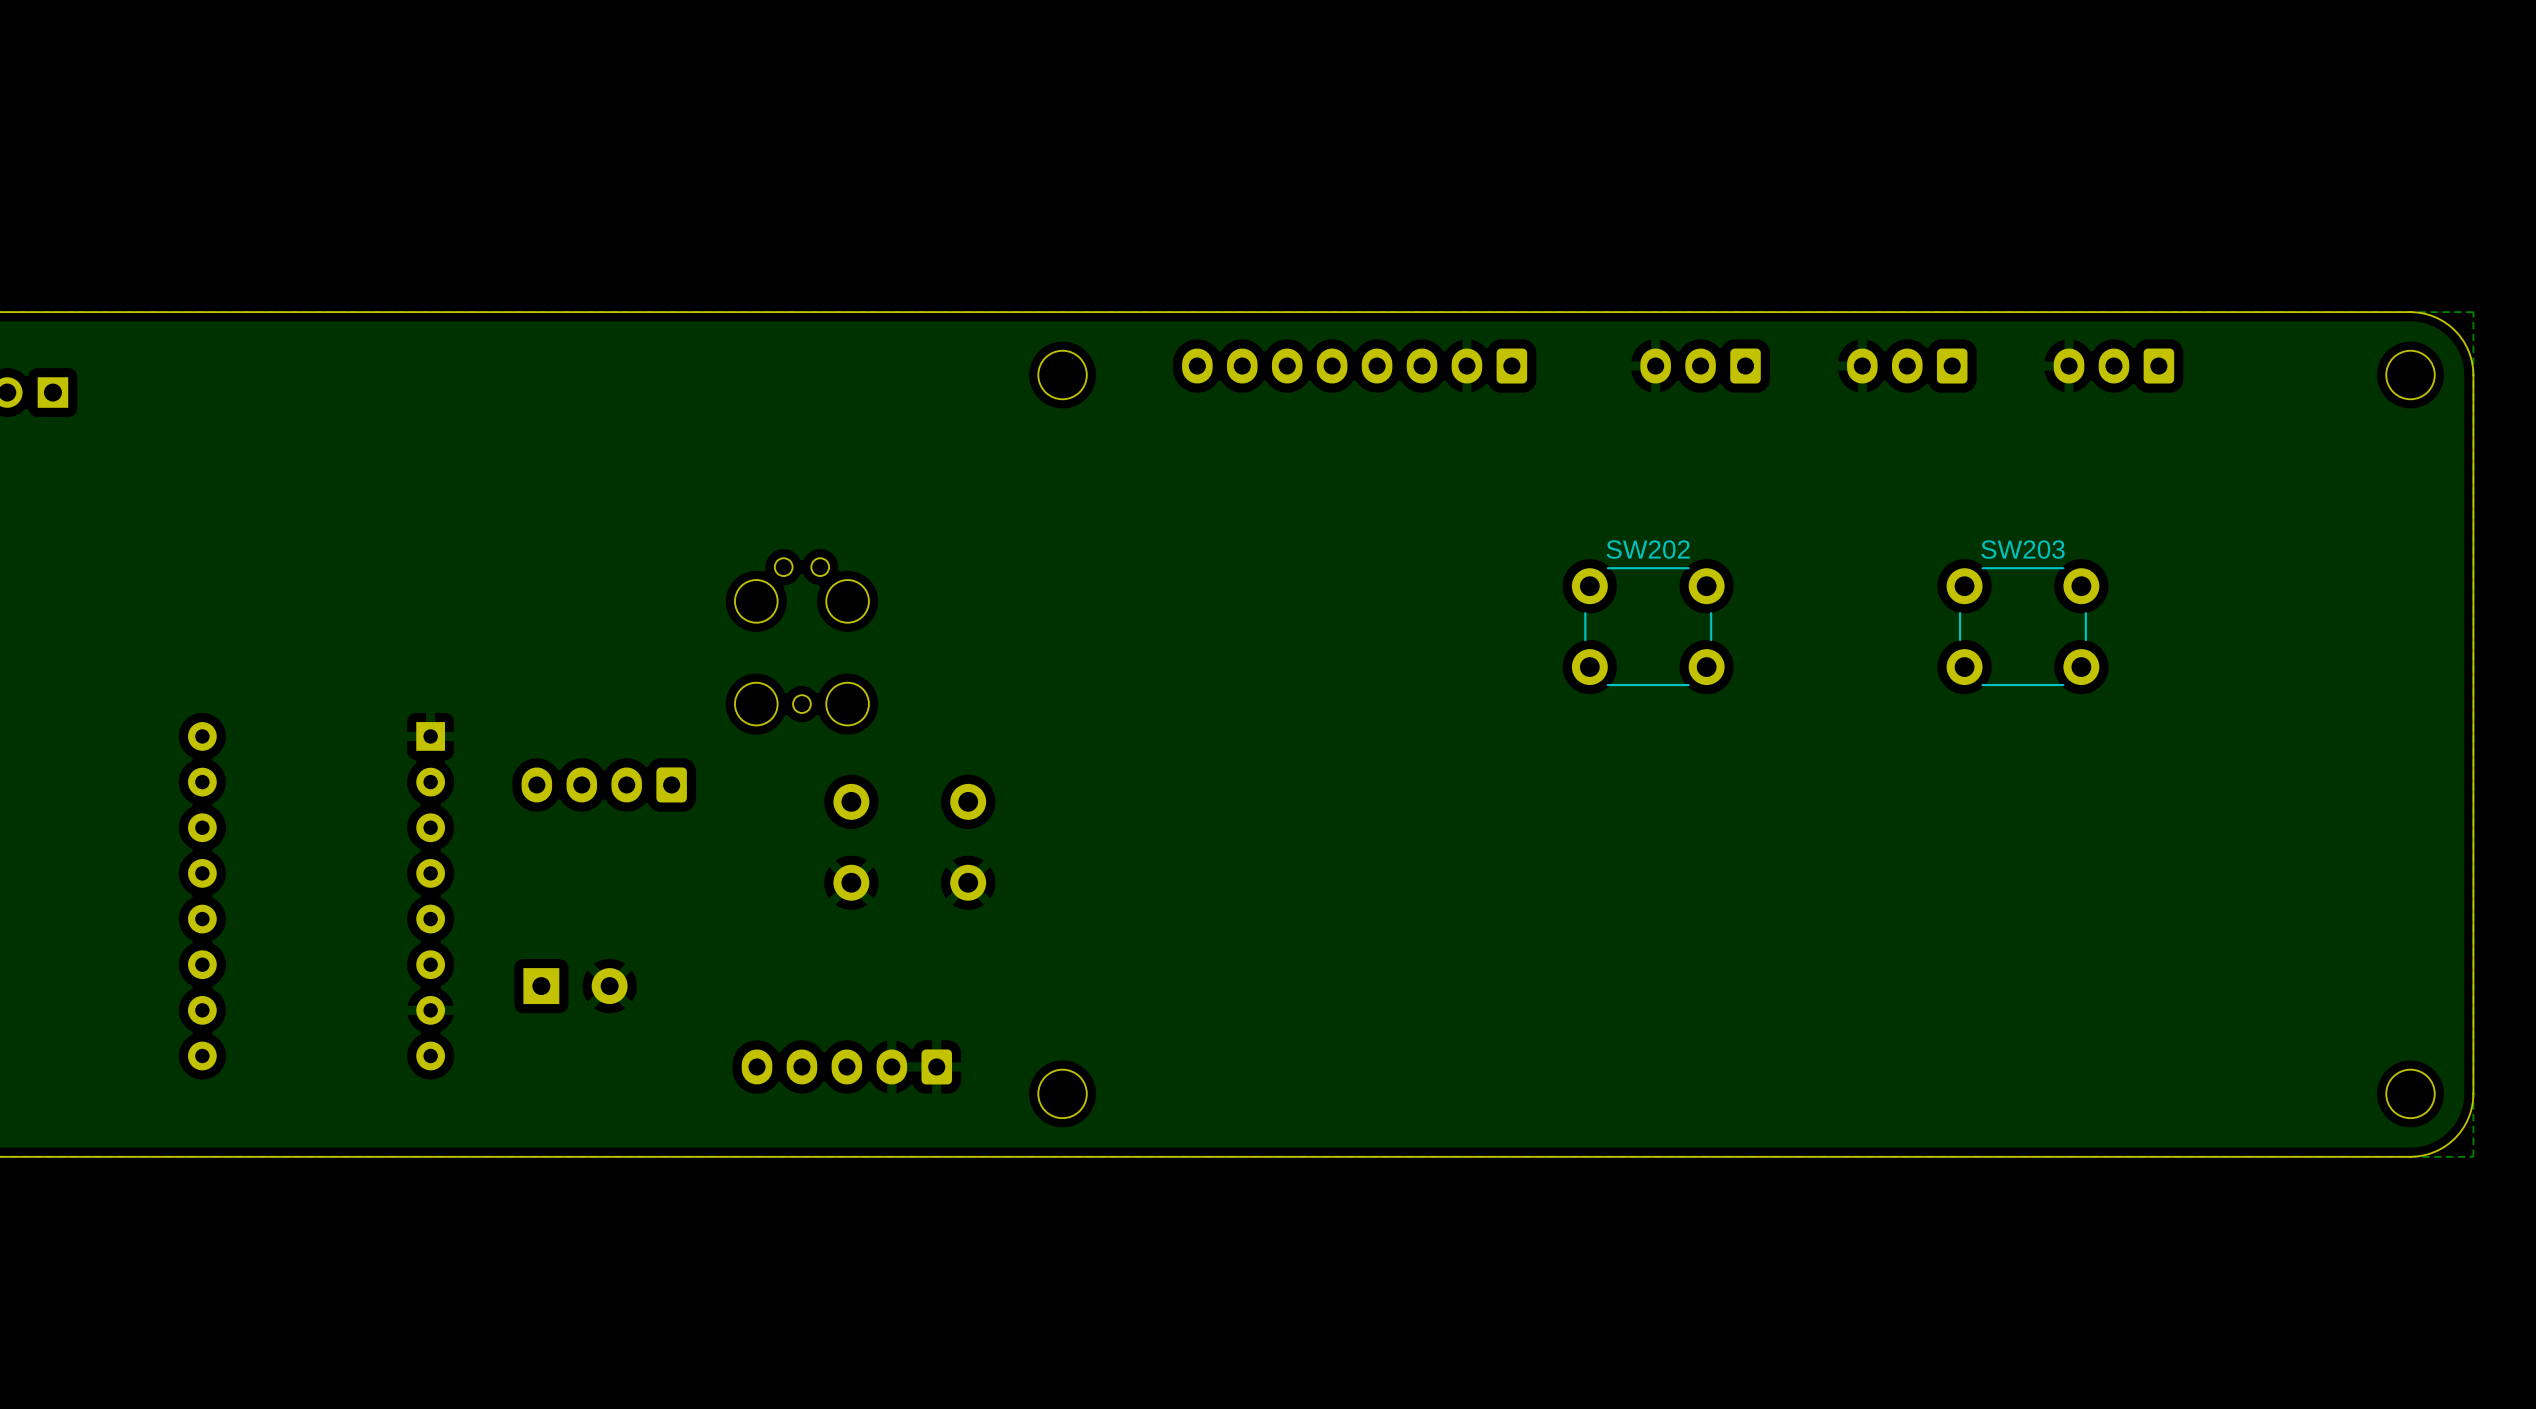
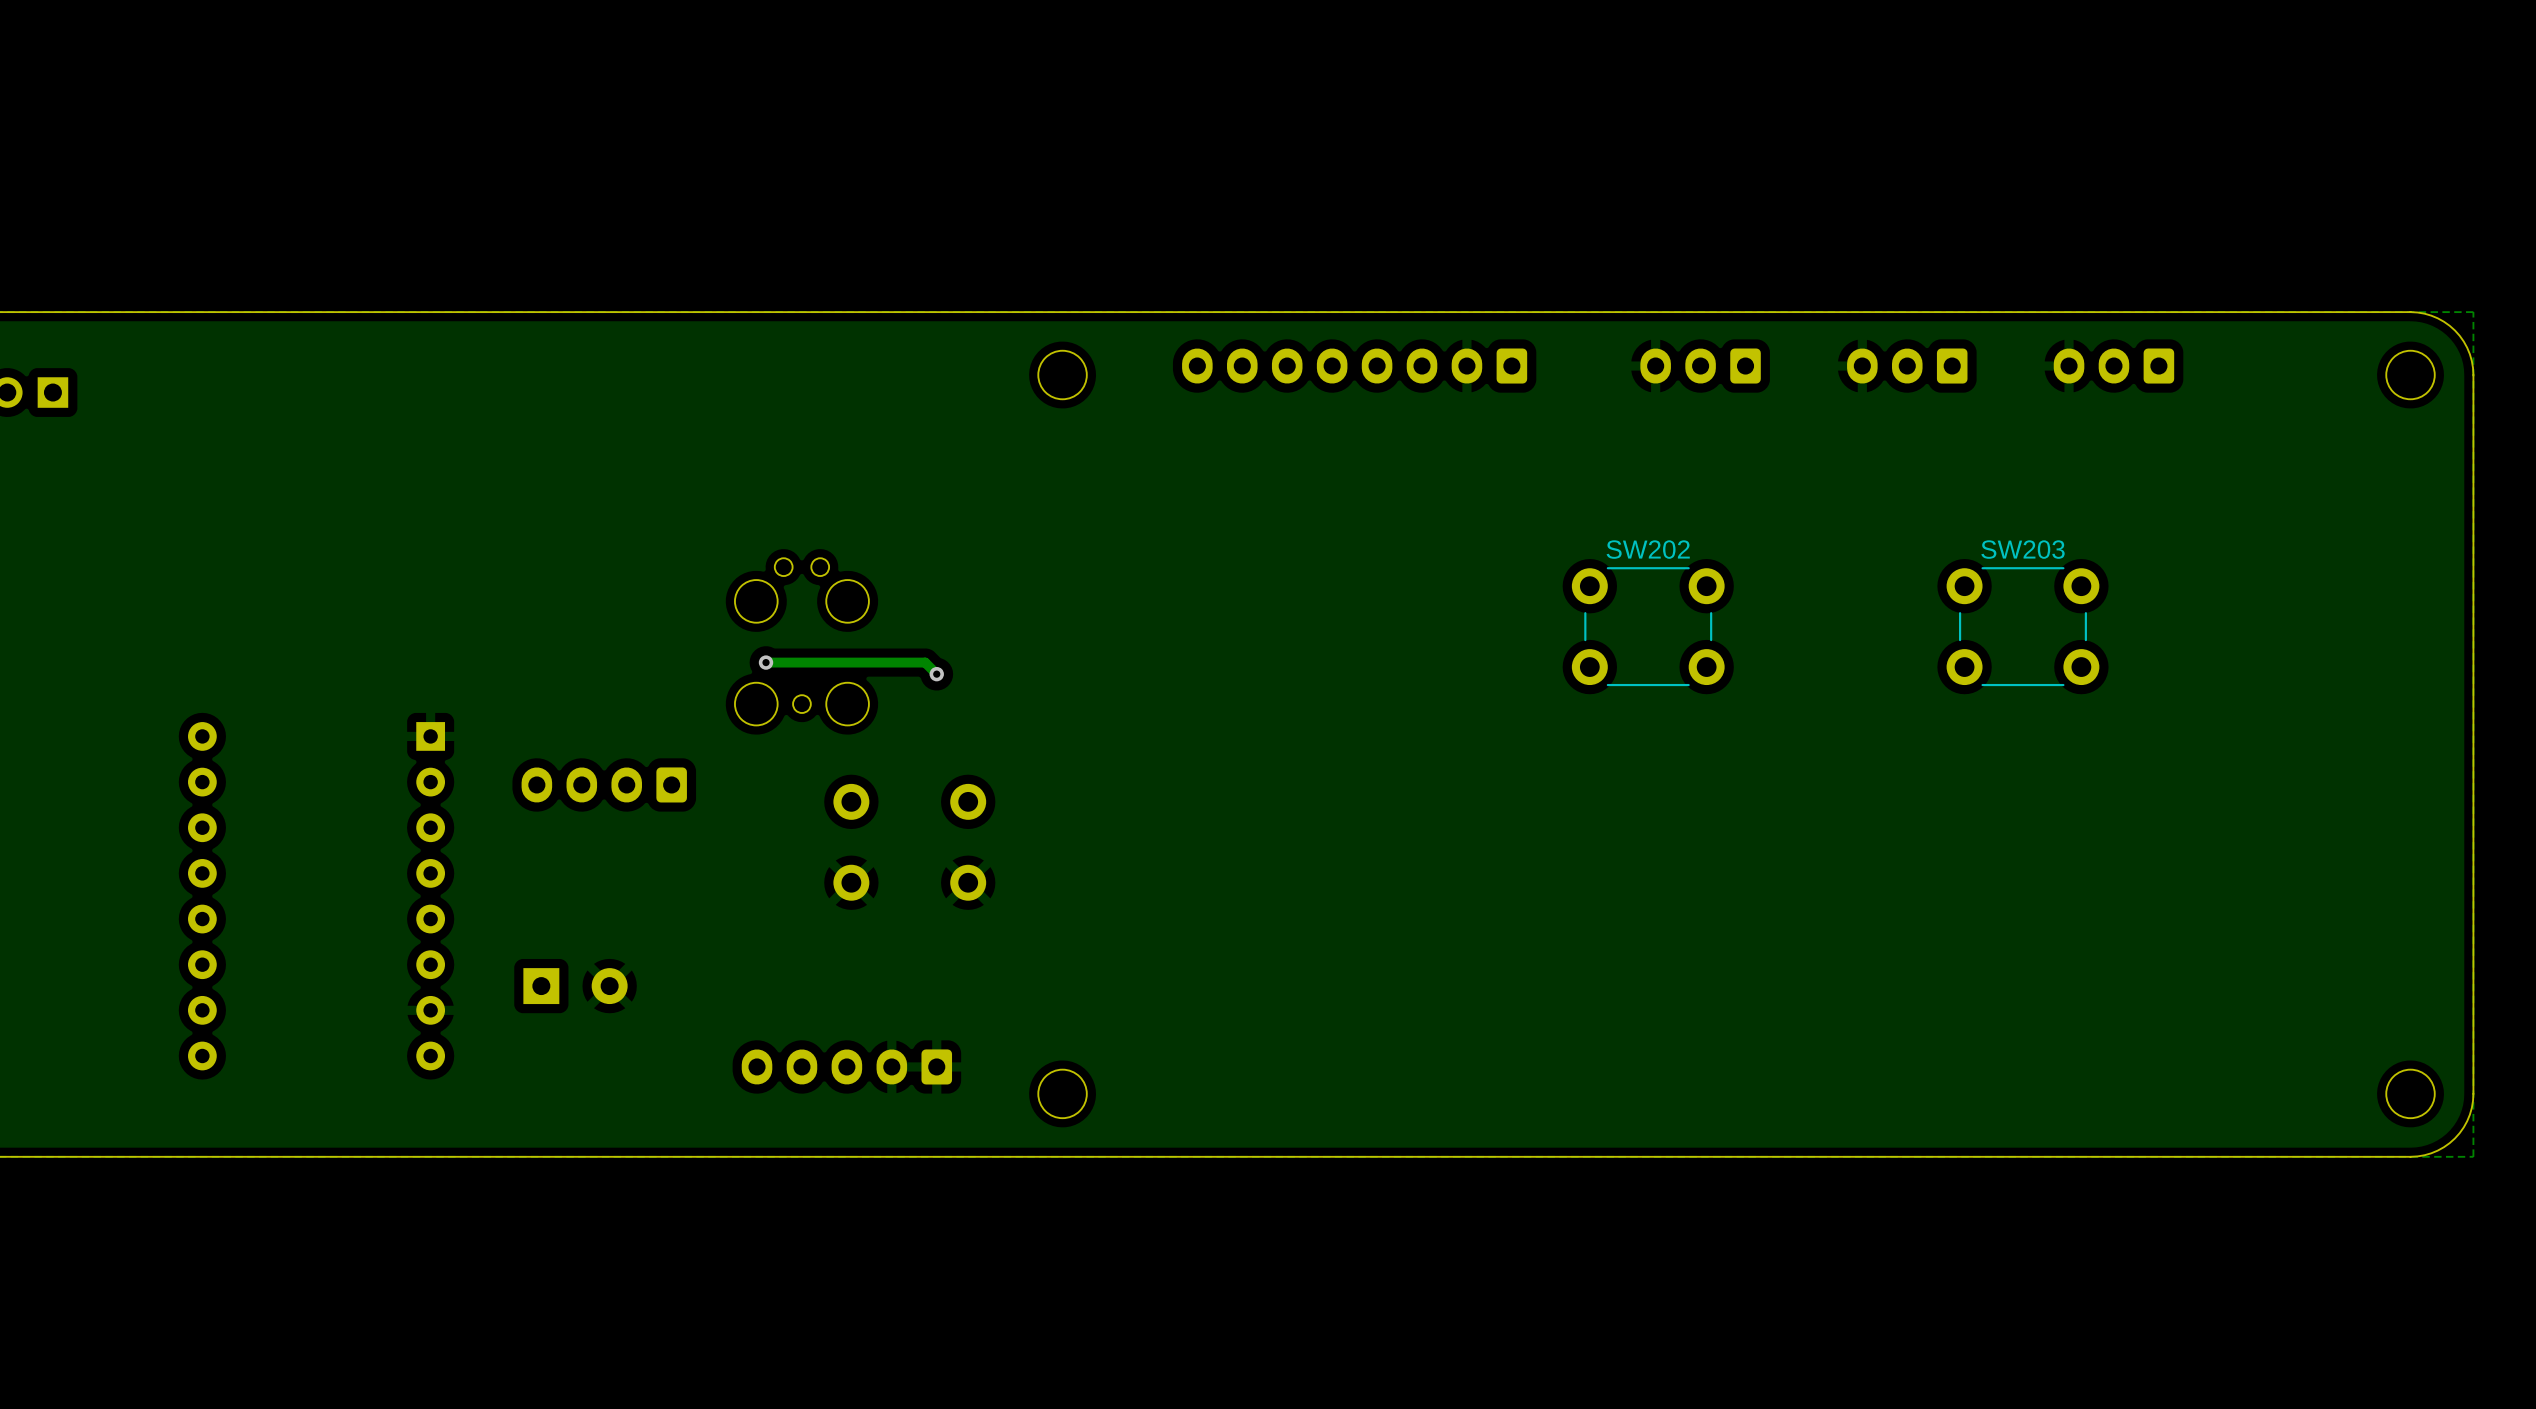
track: none -> (766, 662) (925, 662) (936, 674)
via: none -> (766, 662)
via: none -> (936, 674)

